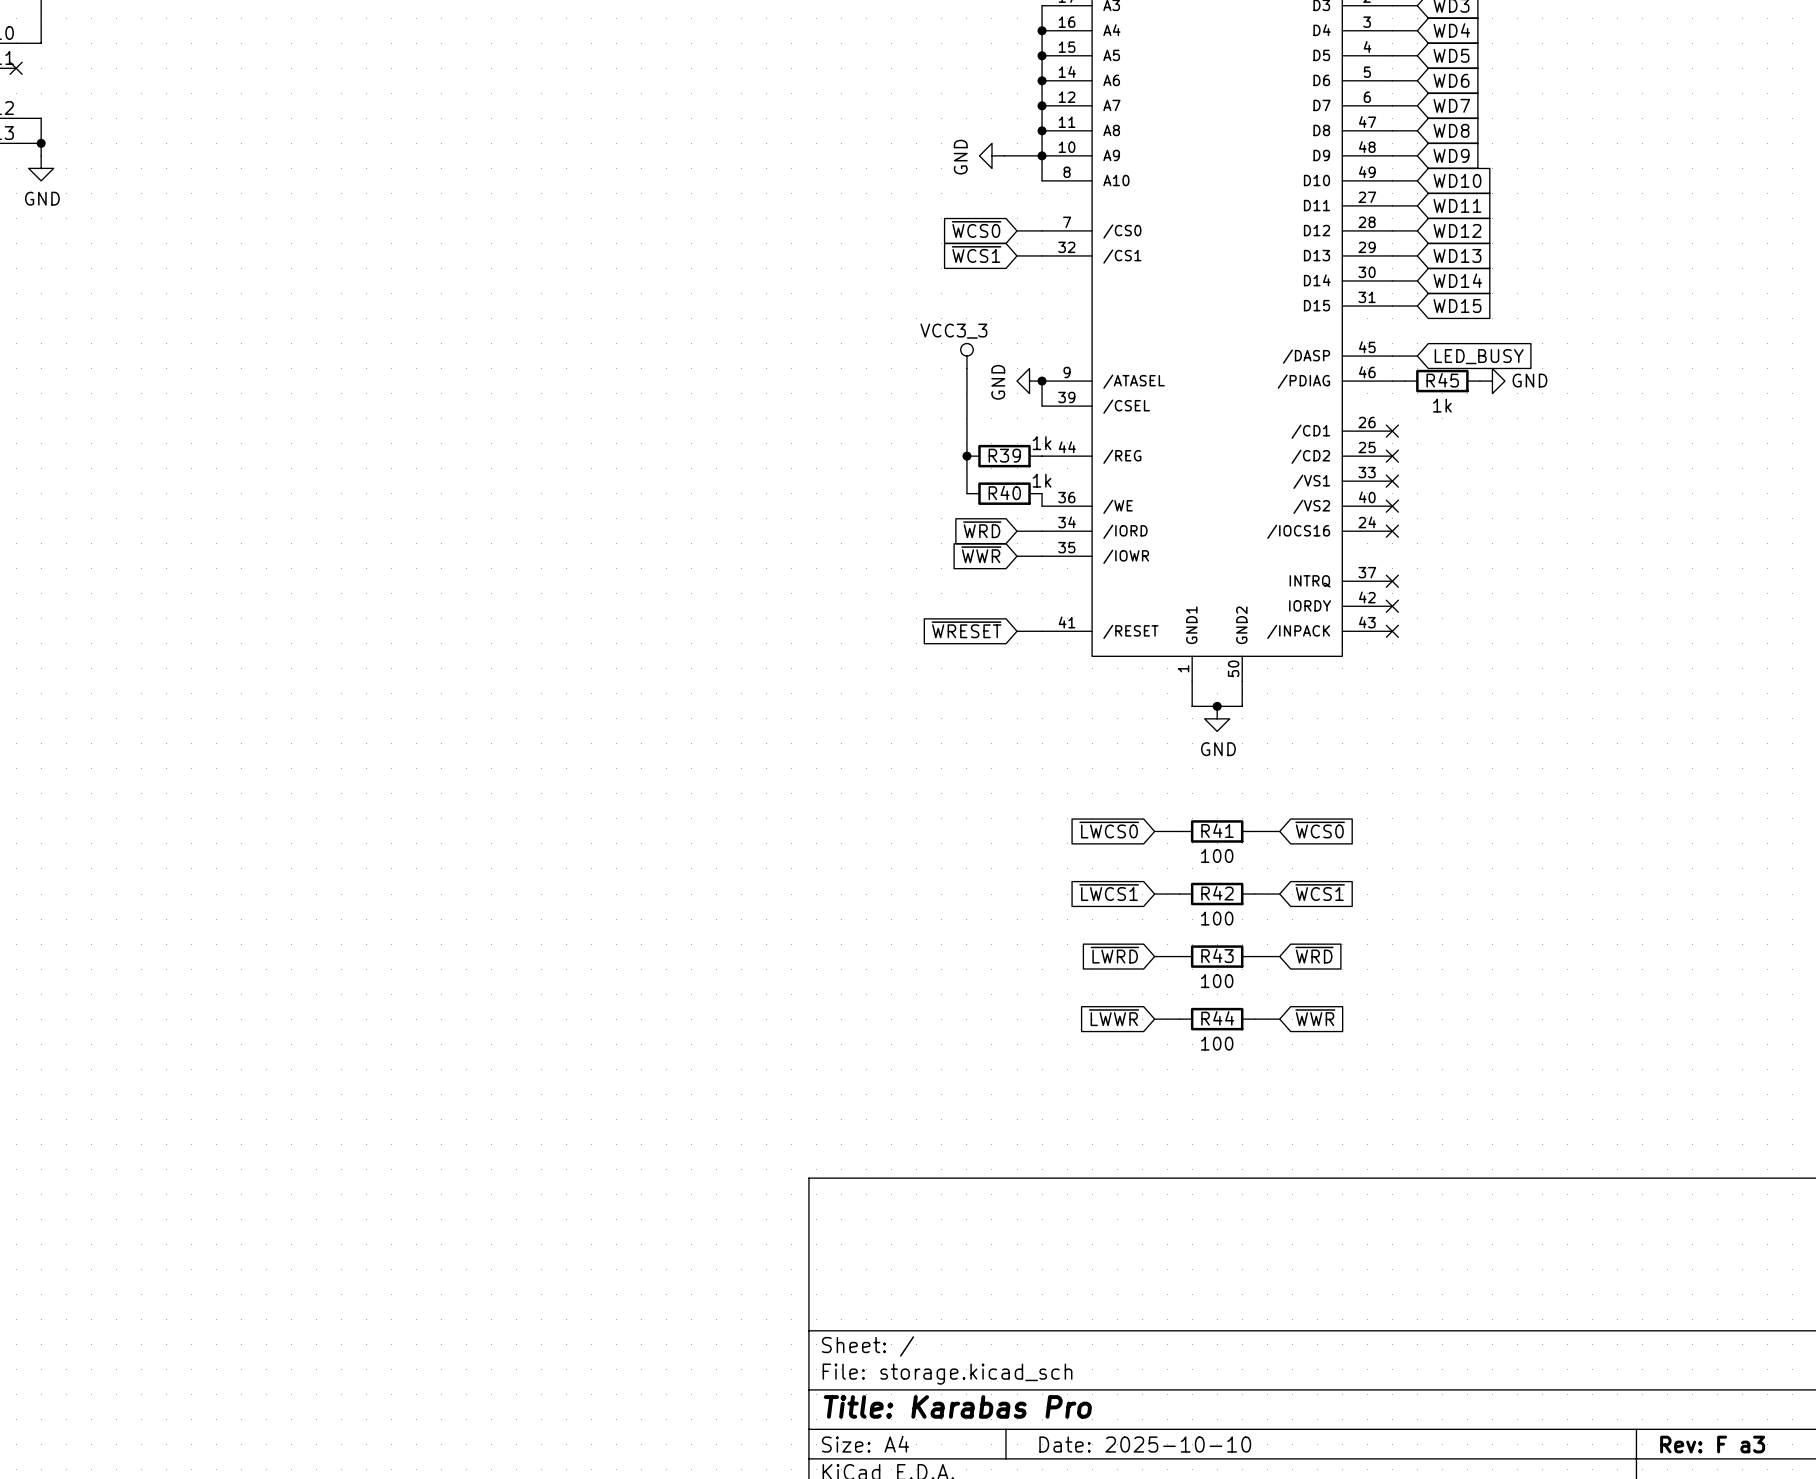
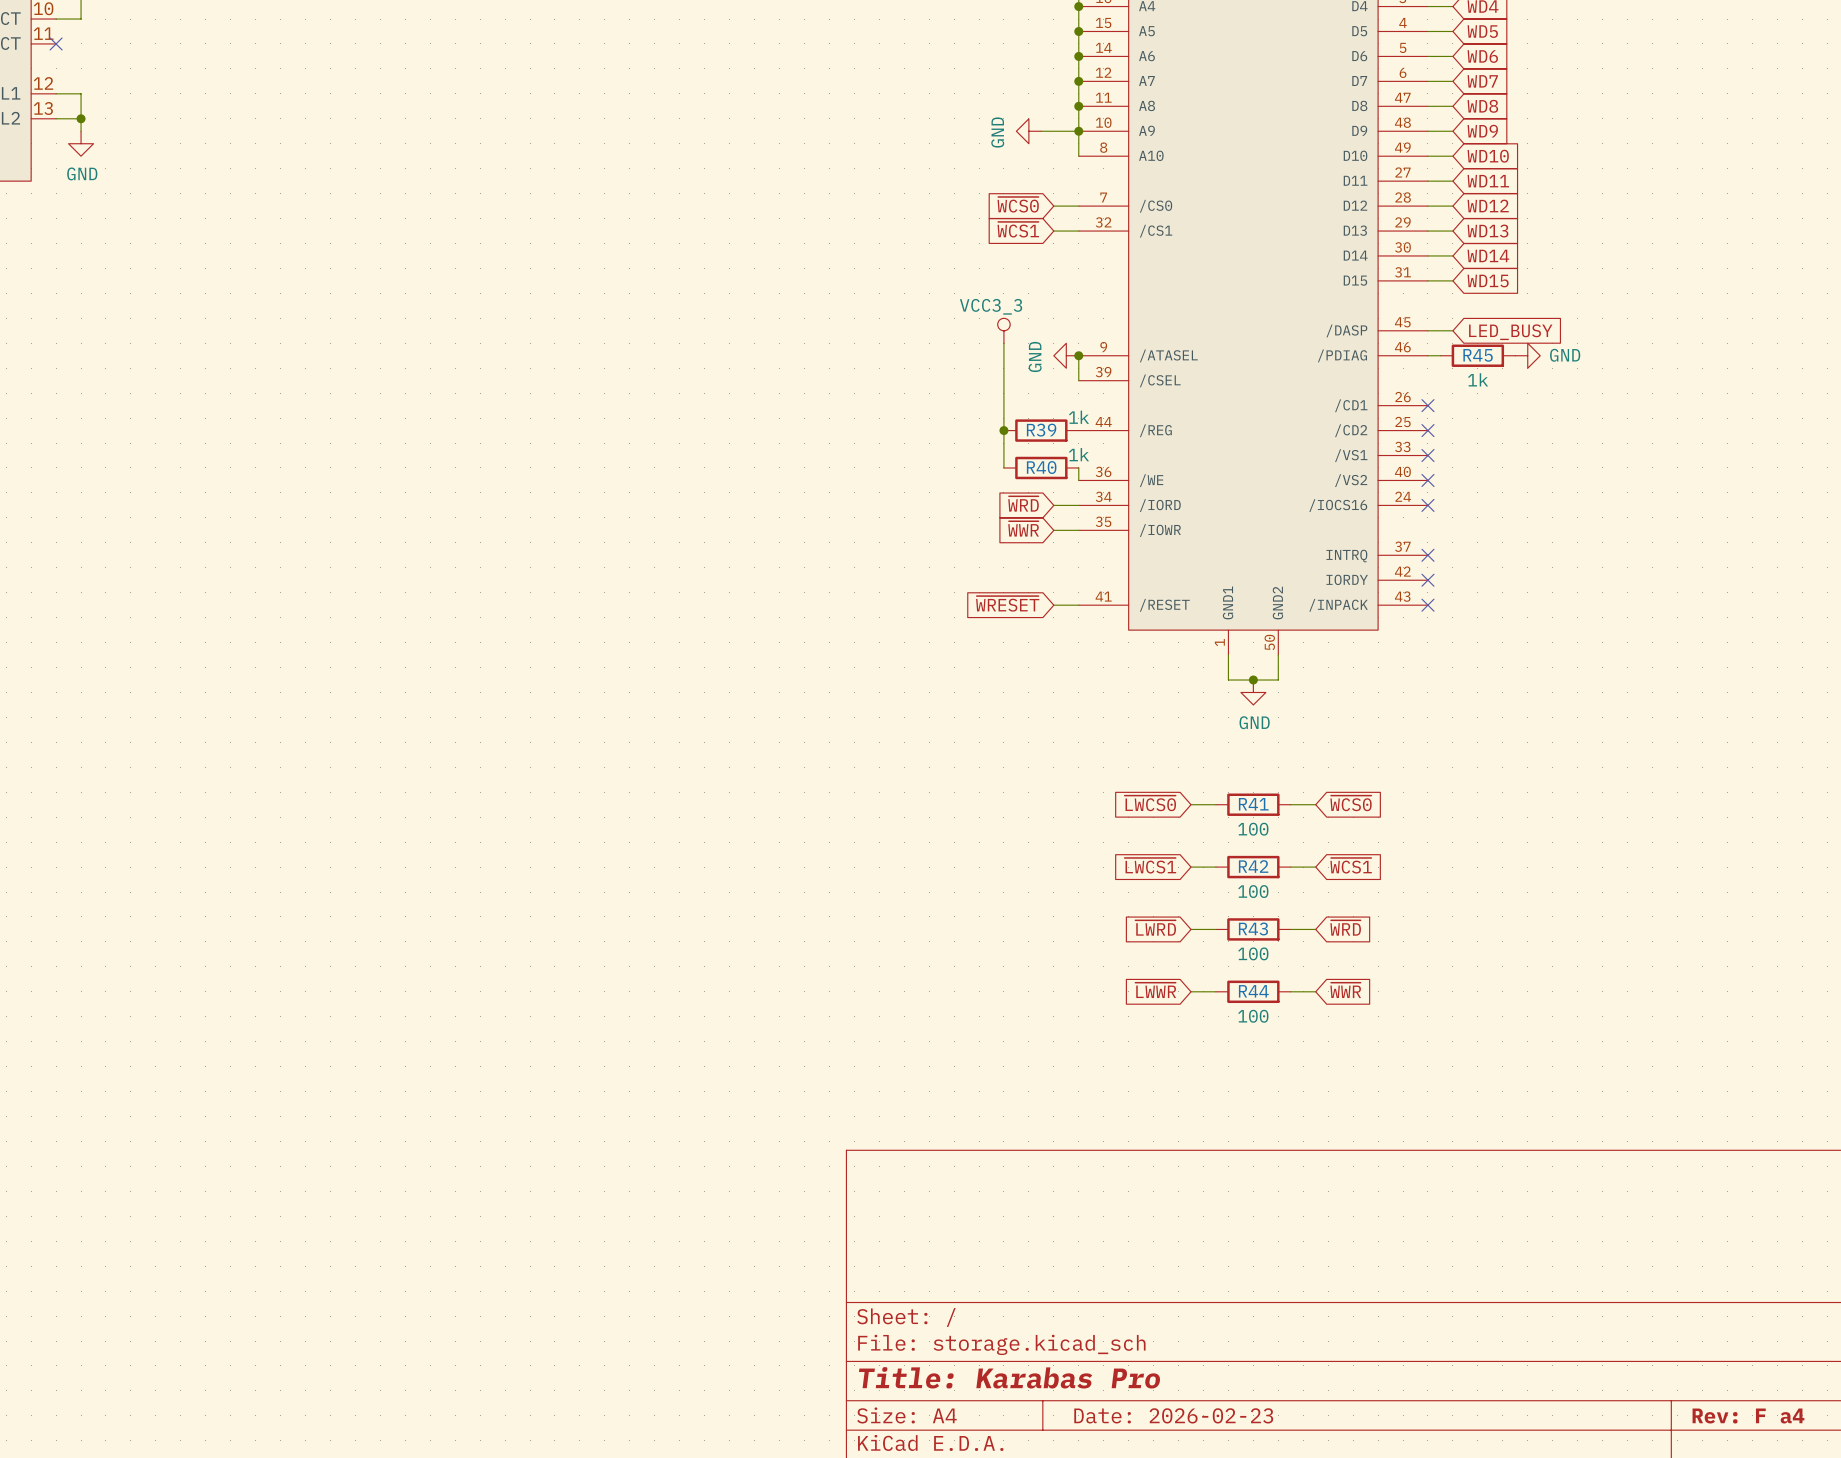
title block: Date: 2025-10-10 (1145, 1444) -> Date: 2026-02-23 (1173, 1415)
title block: Rev: F a3 (1712, 1444) -> Rev: F a4 (1748, 1416)

